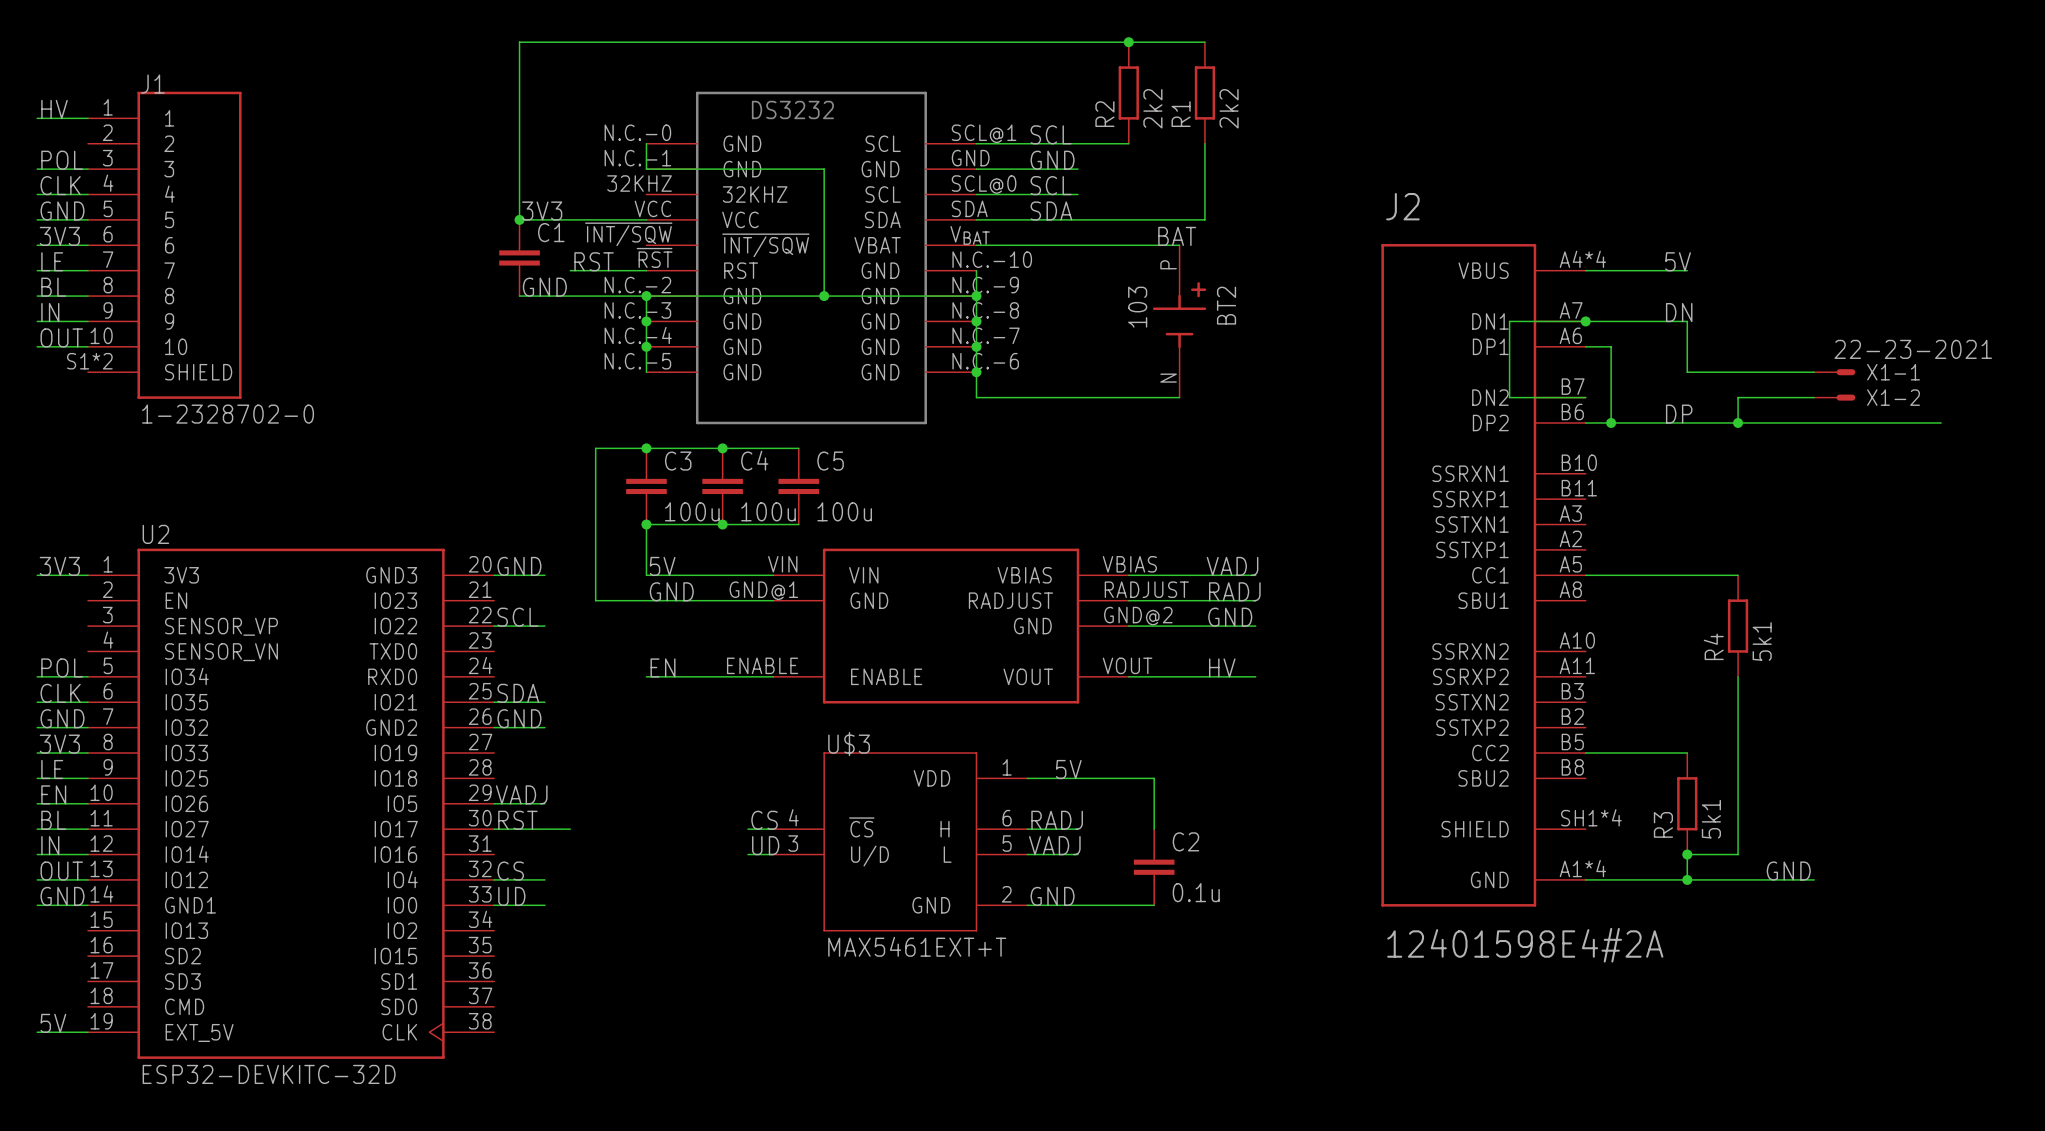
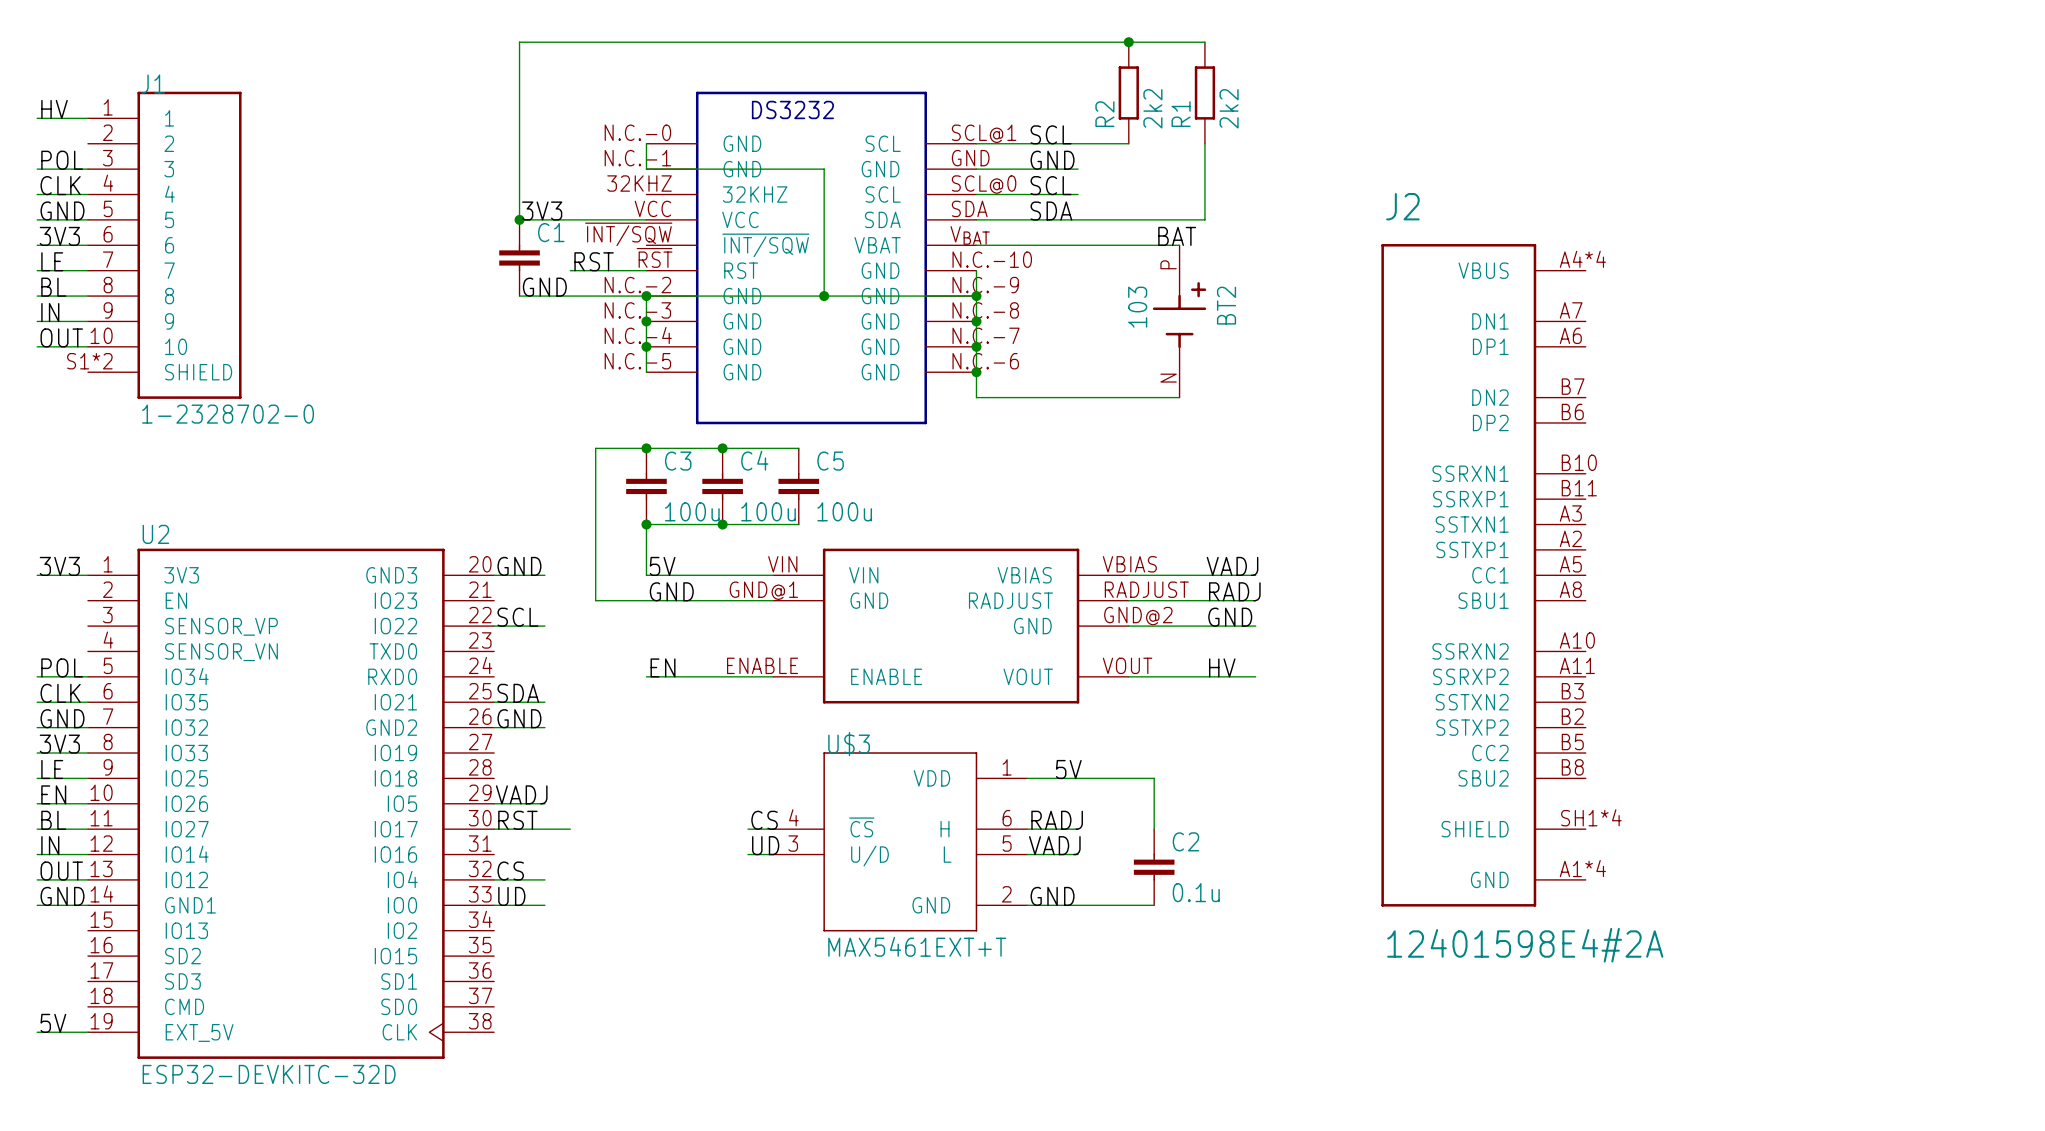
label: 5V (1678, 261) -> none
wire: (1585, 270) (1687, 270) -> none
label: DN (1679, 312) -> none
junction: (1585, 321) -> none
wire: (1585, 346) (1611, 346) (1611, 422) -> none
wire: (1814, 372) (1687, 372) (1687, 321) (1509, 321) (1509, 397) (1585, 397) -> none
X1-1: 22-23-2021 (1834, 372) -> none
wire: (1814, 397) (1738, 397) (1738, 422) -> none
X1-2: (1834, 397) -> none
label: DP (1679, 414) -> none
wire: (1585, 422) (1941, 422) -> none
junction: (1611, 422) -> none
junction: (1738, 422) -> none
wire: (1585, 575) (1738, 575) -> none
R4: 5k1 (1738, 626) -> none
wire: (1738, 676) (1738, 854) (1687, 854) (1687, 879) -> none
wire: (1585, 753) (1687, 753) -> none
R3: 5k1 (1687, 803) -> none
junction: (1687, 854) -> none
label: GND (1788, 871) -> none
wire: (1585, 879) (1814, 879) -> none
junction: (1687, 879) -> none

